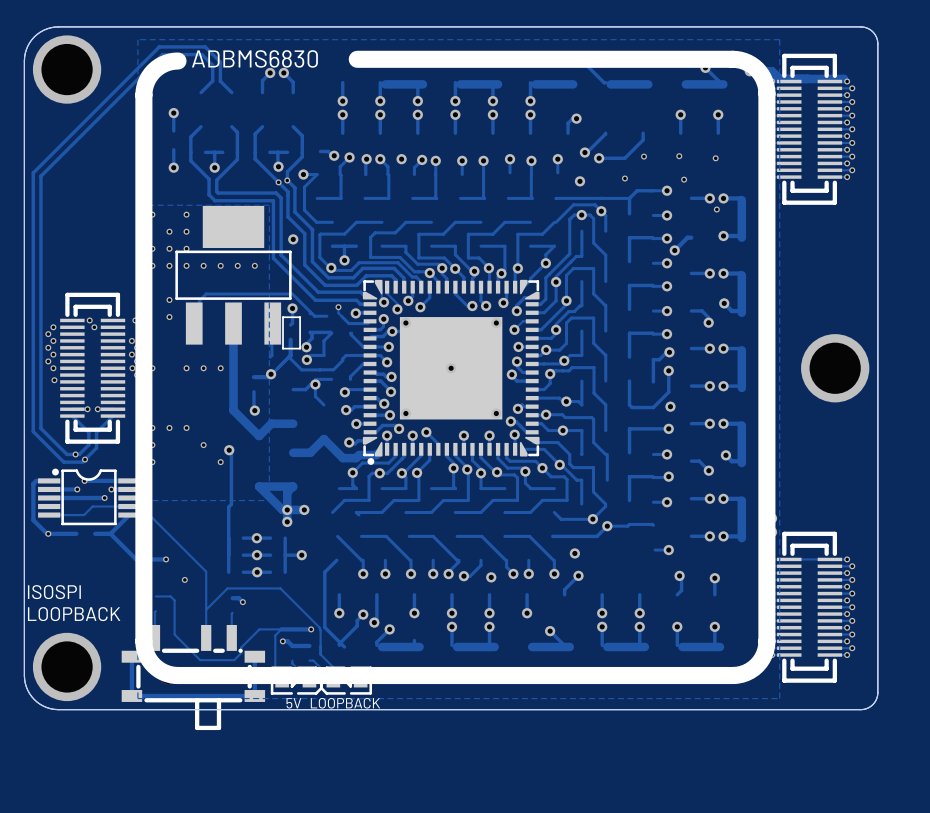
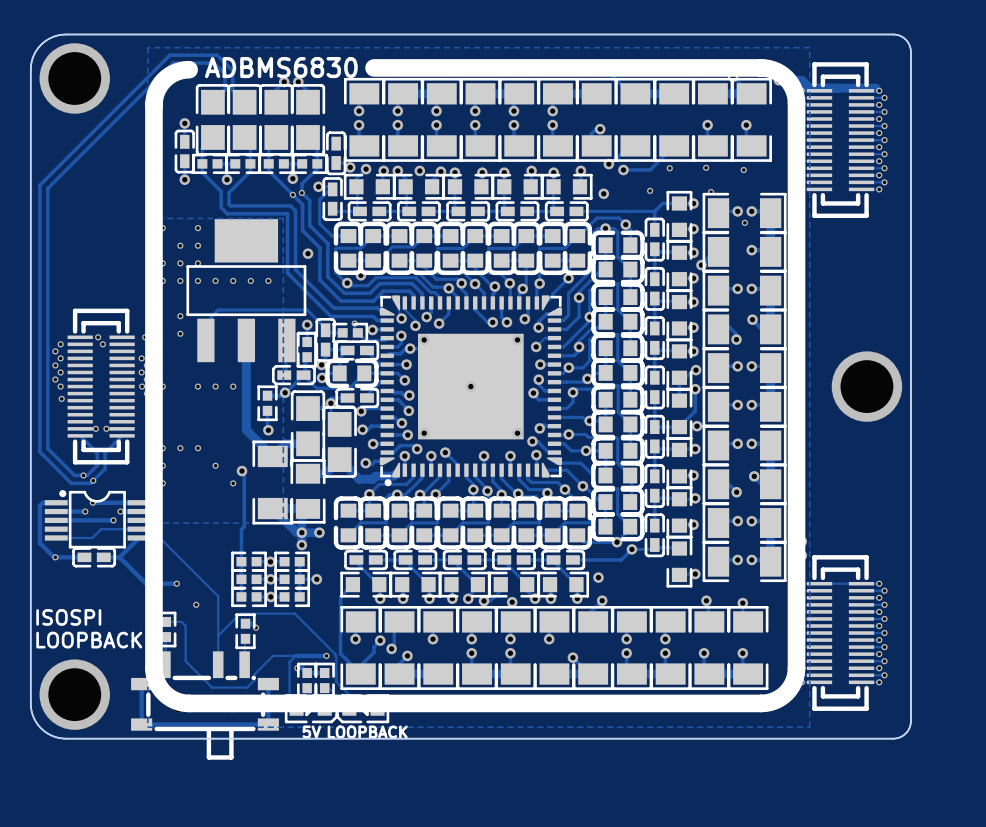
part: none -> (212, 119)
part: none -> (244, 119)
part: none -> (276, 119)
part: none -> (308, 119)
part: none -> (364, 119)
part: none -> (403, 119)
part: none -> (441, 119)
part: none -> (480, 119)
part: none -> (519, 119)
part: none -> (557, 119)
part: none -> (596, 119)
part: none -> (635, 119)
part: none -> (674, 119)
part: none -> (712, 119)
part: none -> (751, 119)
part: none -> (184, 151)
part: none -> (336, 153)
part: none -> (209, 163)
part: none -> (242, 163)
part: none -> (276, 163)
part: none -> (309, 163)
part: none -> (369, 186)
part: none -> (418, 186)
part: none -> (468, 186)
part: none -> (517, 186)
part: none -> (566, 186)
part: none -> (332, 199)
part: none -> (369, 211)
part: none -> (418, 211)
part: none -> (468, 211)
part: none -> (517, 211)
part: none -> (566, 211)
part: none -> (744, 213)
part: none -> (679, 216)
part: none -> (654, 239)
part: none -> (618, 245)
part: none -> (348, 248)
part: none -> (373, 248)
part: none -> (399, 248)
part: none -> (424, 248)
part: none -> (450, 248)
part: none -> (475, 248)
part: none -> (501, 248)
part: none -> (526, 248)
part: none -> (552, 248)
part: none -> (577, 248)
part: none -> (744, 251)
part: none -> (679, 265)
part: none -> (618, 269)
part: none -> (654, 288)
part: none -> (744, 290)
part: none -> (618, 297)
part: none -> (679, 315)
part: none -> (618, 321)
part: none -> (744, 329)
part: none -> (350, 332)
part: none -> (654, 338)
part: none -> (325, 339)
part: none -> (618, 348)
part: none -> (307, 349)
part: none -> (357, 350)
part: none -> (679, 364)
part: none -> (744, 368)
part: none -> (618, 372)
part: none -> (352, 373)
part: none -> (293, 375)
part: none -> (654, 387)
part: none -> (357, 398)
part: none -> (618, 399)
part: none -> (267, 403)
part: none -> (744, 406)
part: none -> (679, 413)
part: none -> (618, 424)
part: none -> (308, 426)
part: none -> (654, 436)
part: none -> (339, 442)
part: none -> (744, 445)
part: none -> (618, 450)
part: none -> (679, 463)
part: none -> (617, 475)
part: none -> (272, 482)
part: none -> (744, 484)
part: none -> (654, 486)
part: none -> (308, 491)
part: none -> (617, 502)
part: none -> (679, 512)
part: none -> (348, 523)
part: none -> (373, 523)
part: none -> (399, 523)
part: none -> (424, 523)
part: none -> (450, 523)
part: none -> (475, 523)
part: none -> (501, 523)
part: none -> (526, 523)
part: none -> (552, 523)
part: none -> (577, 523)
part: none -> (744, 523)
part: none -> (617, 526)
part: none -> (654, 535)
part: none -> (94, 557)
part: none -> (366, 559)
part: none -> (415, 559)
part: none -> (464, 559)
part: none -> (513, 559)
part: none -> (563, 559)
part: none -> (249, 561)
part: none -> (292, 561)
part: none -> (679, 561)
part: none -> (744, 561)
part: none -> (249, 579)
part: none -> (292, 579)
part: none -> (366, 584)
part: none -> (415, 584)
part: none -> (464, 584)
part: none -> (513, 584)
part: none -> (563, 584)
part: none -> (249, 596)
part: none -> (292, 596)
part: none -> (166, 629)
part: none -> (245, 631)
part: none -> (360, 647)
part: none -> (399, 647)
part: none -> (438, 647)
part: none -> (477, 647)
part: none -> (515, 647)
part: none -> (554, 647)
part: none -> (593, 647)
part: none -> (631, 647)
part: none -> (670, 647)
part: none -> (709, 647)
part: none -> (748, 647)
part: none -> (307, 680)
part: none -> (324, 680)

